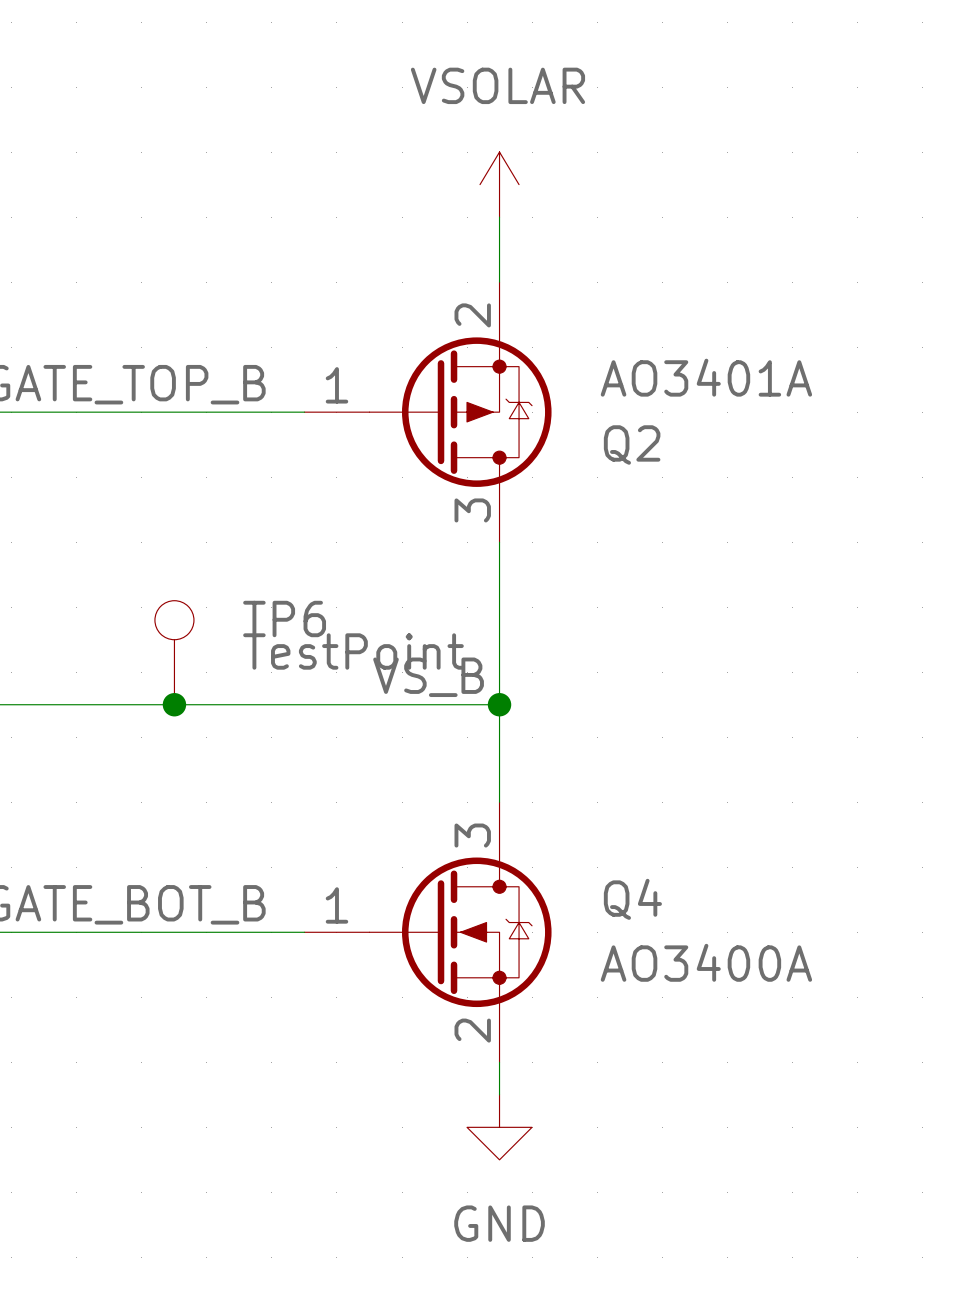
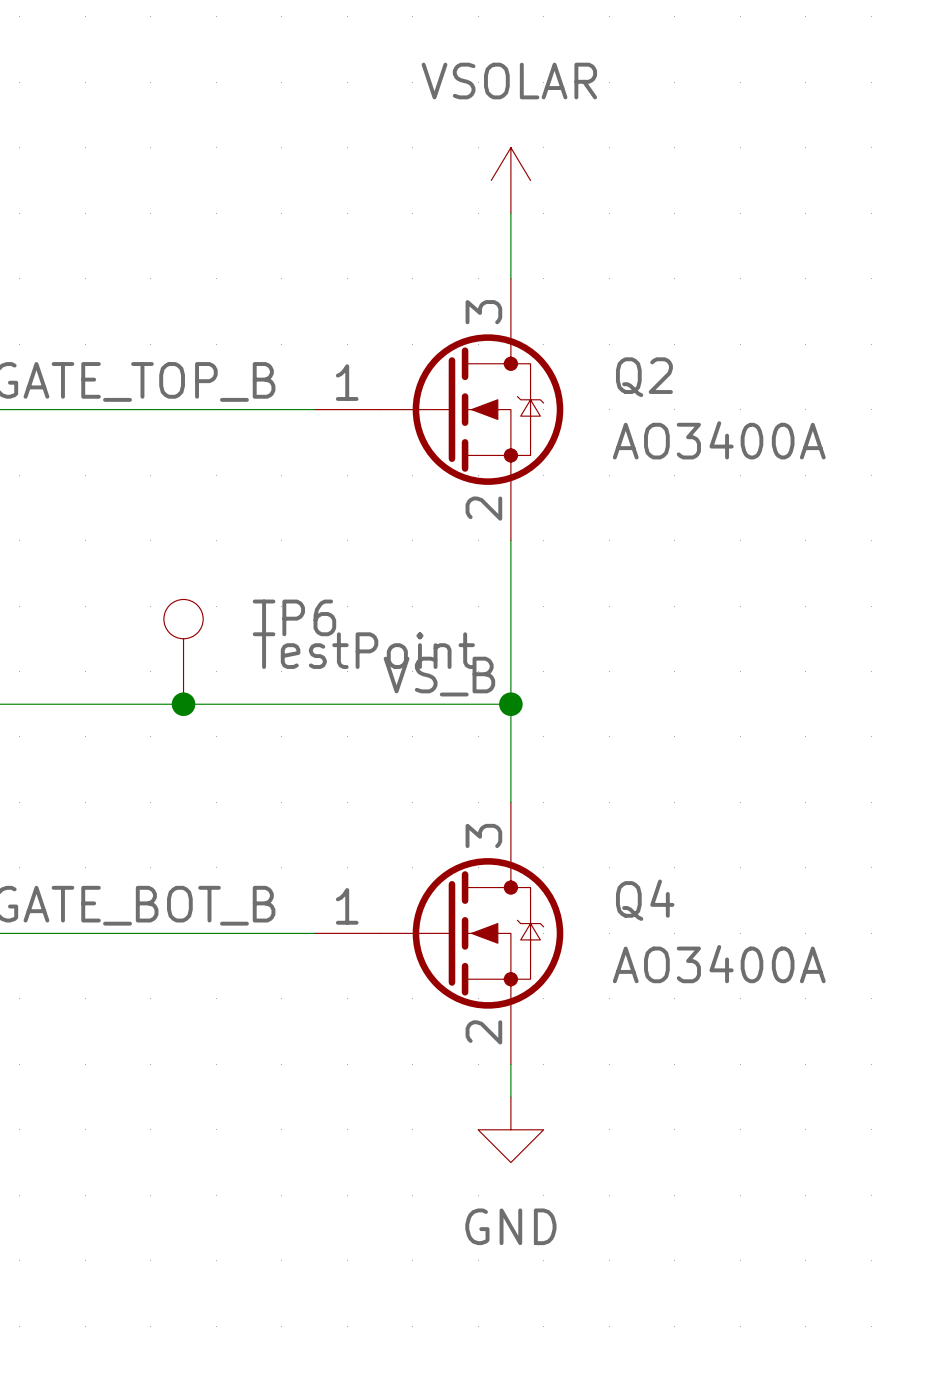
Q2 symbol: [304, 282, 552, 543] -> [314, 278, 564, 541]
Q2 value: AO3401A (706, 377) -> AO3400A (719, 440)
Q2 name position: Q2 (632, 445) -> Q2 (644, 377)

